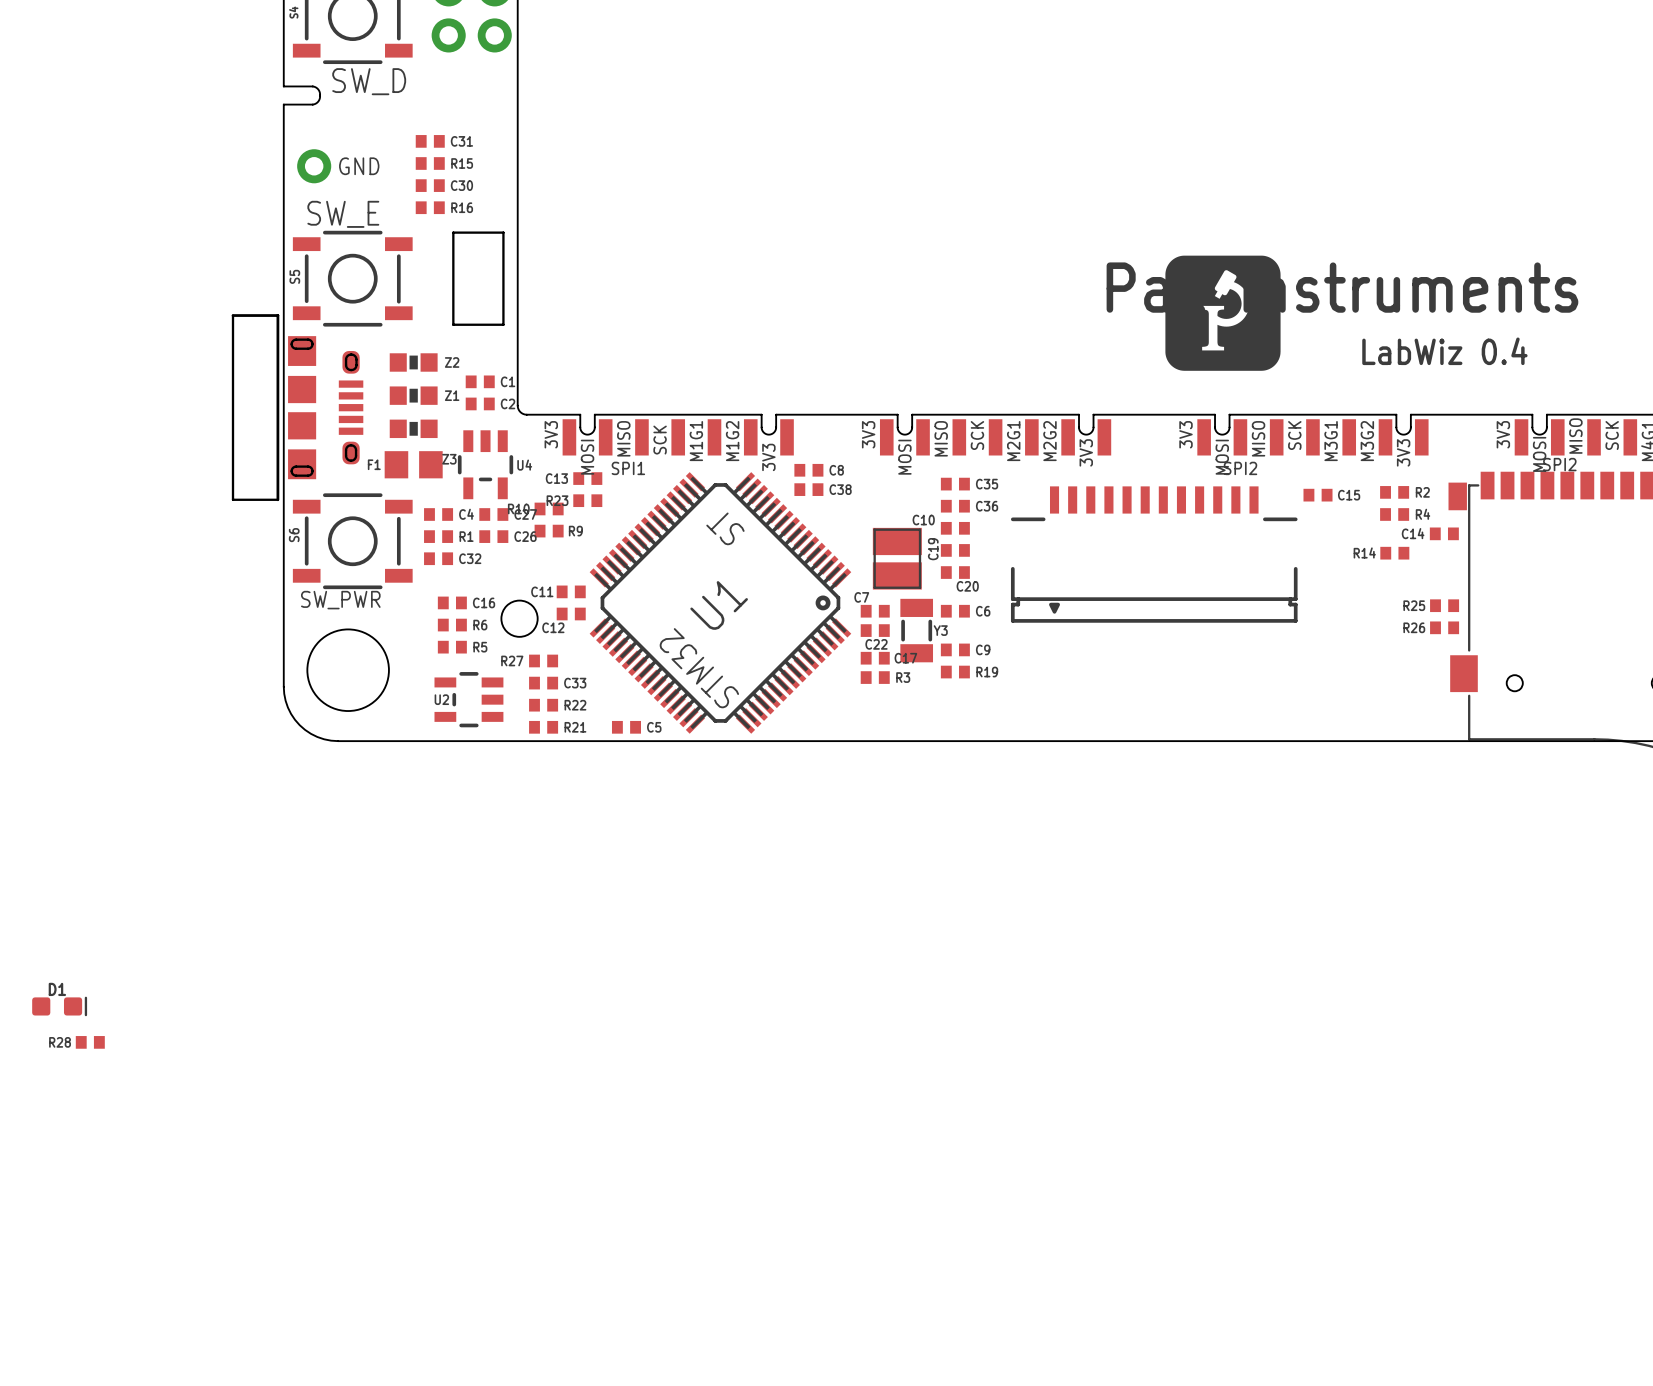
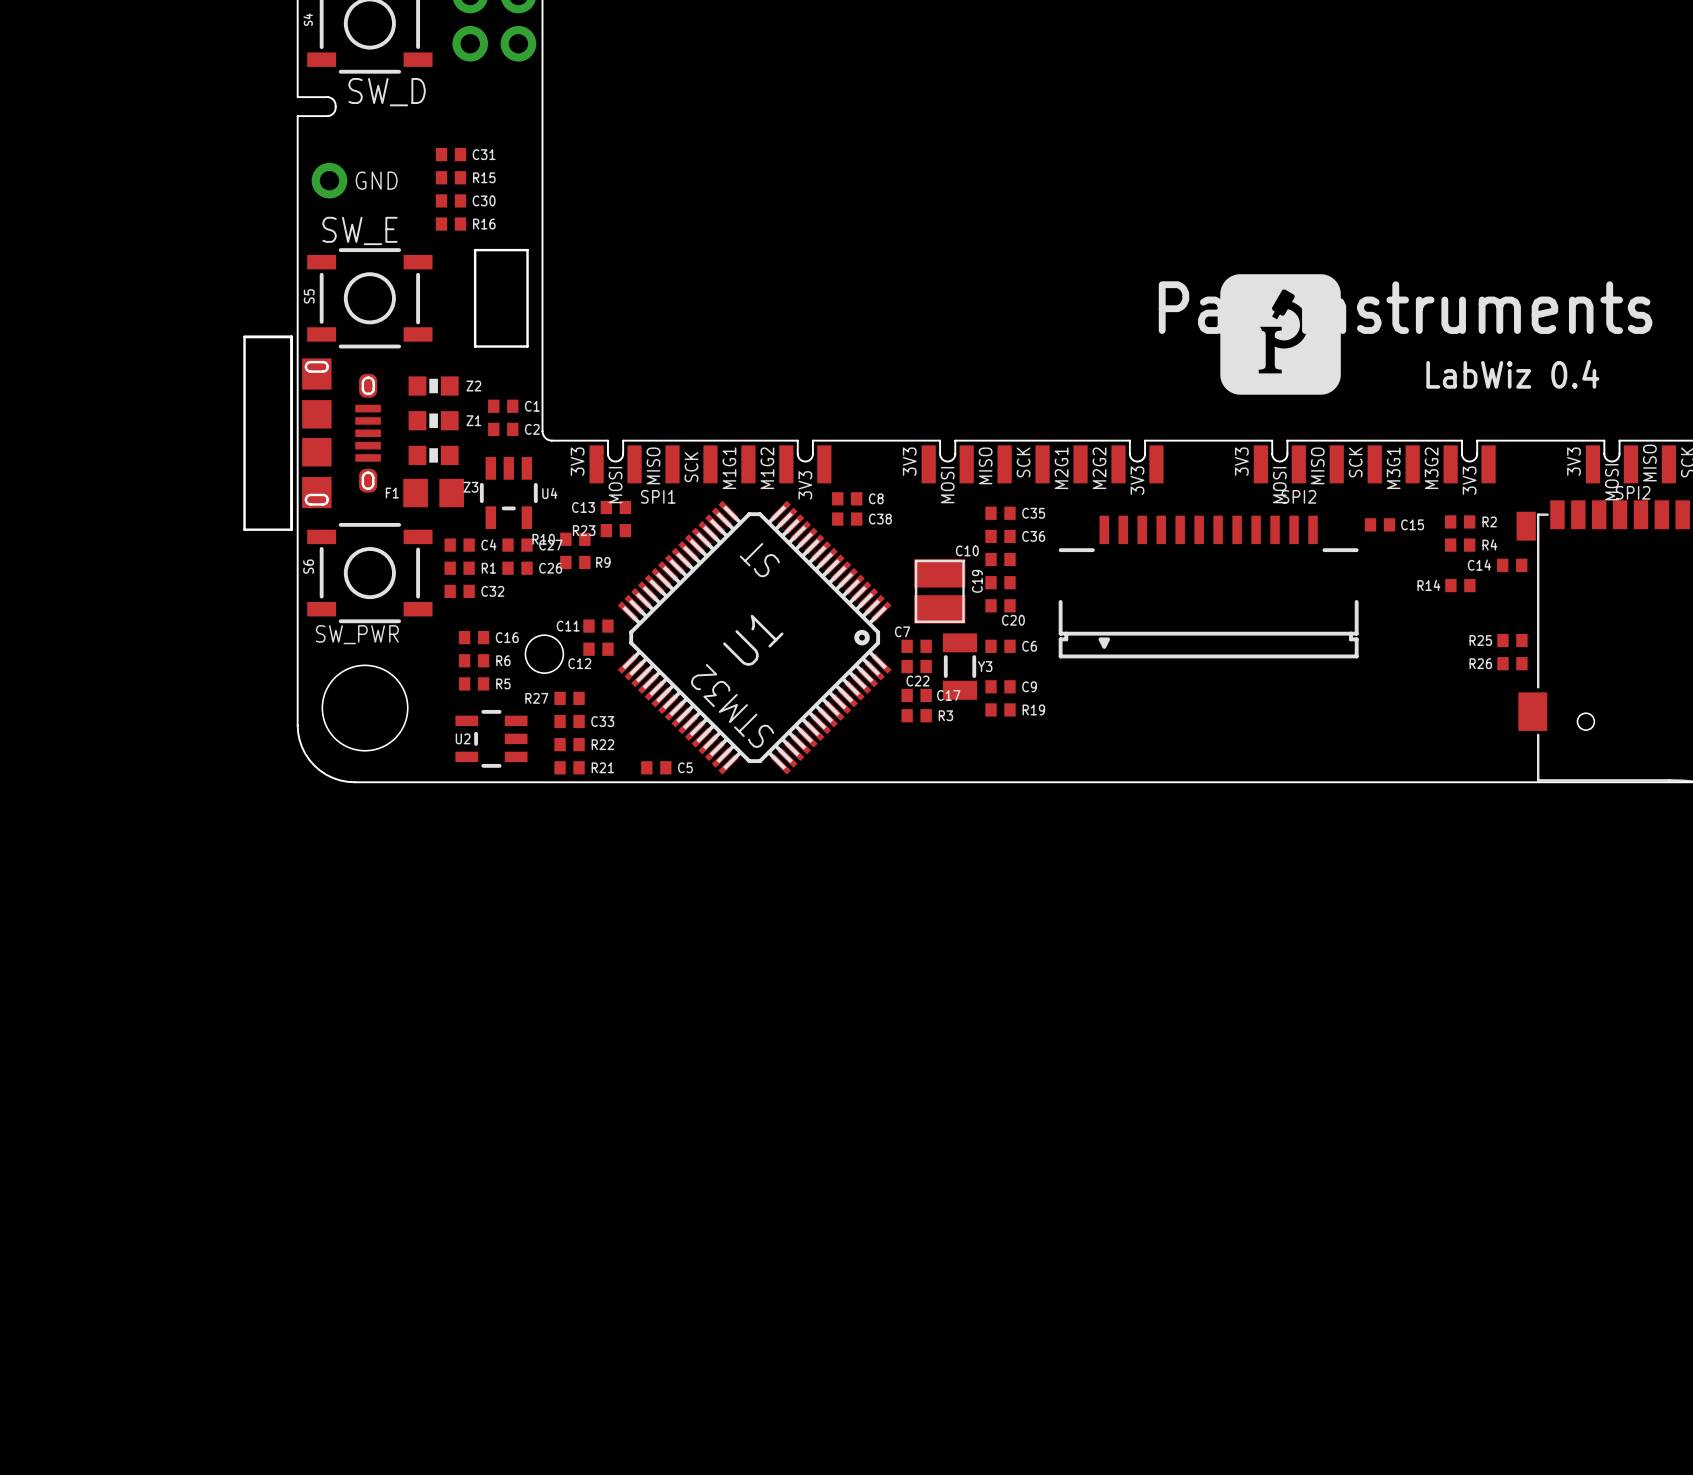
D1: (59, 1006) -> none
R28: (90, 1042) -> none

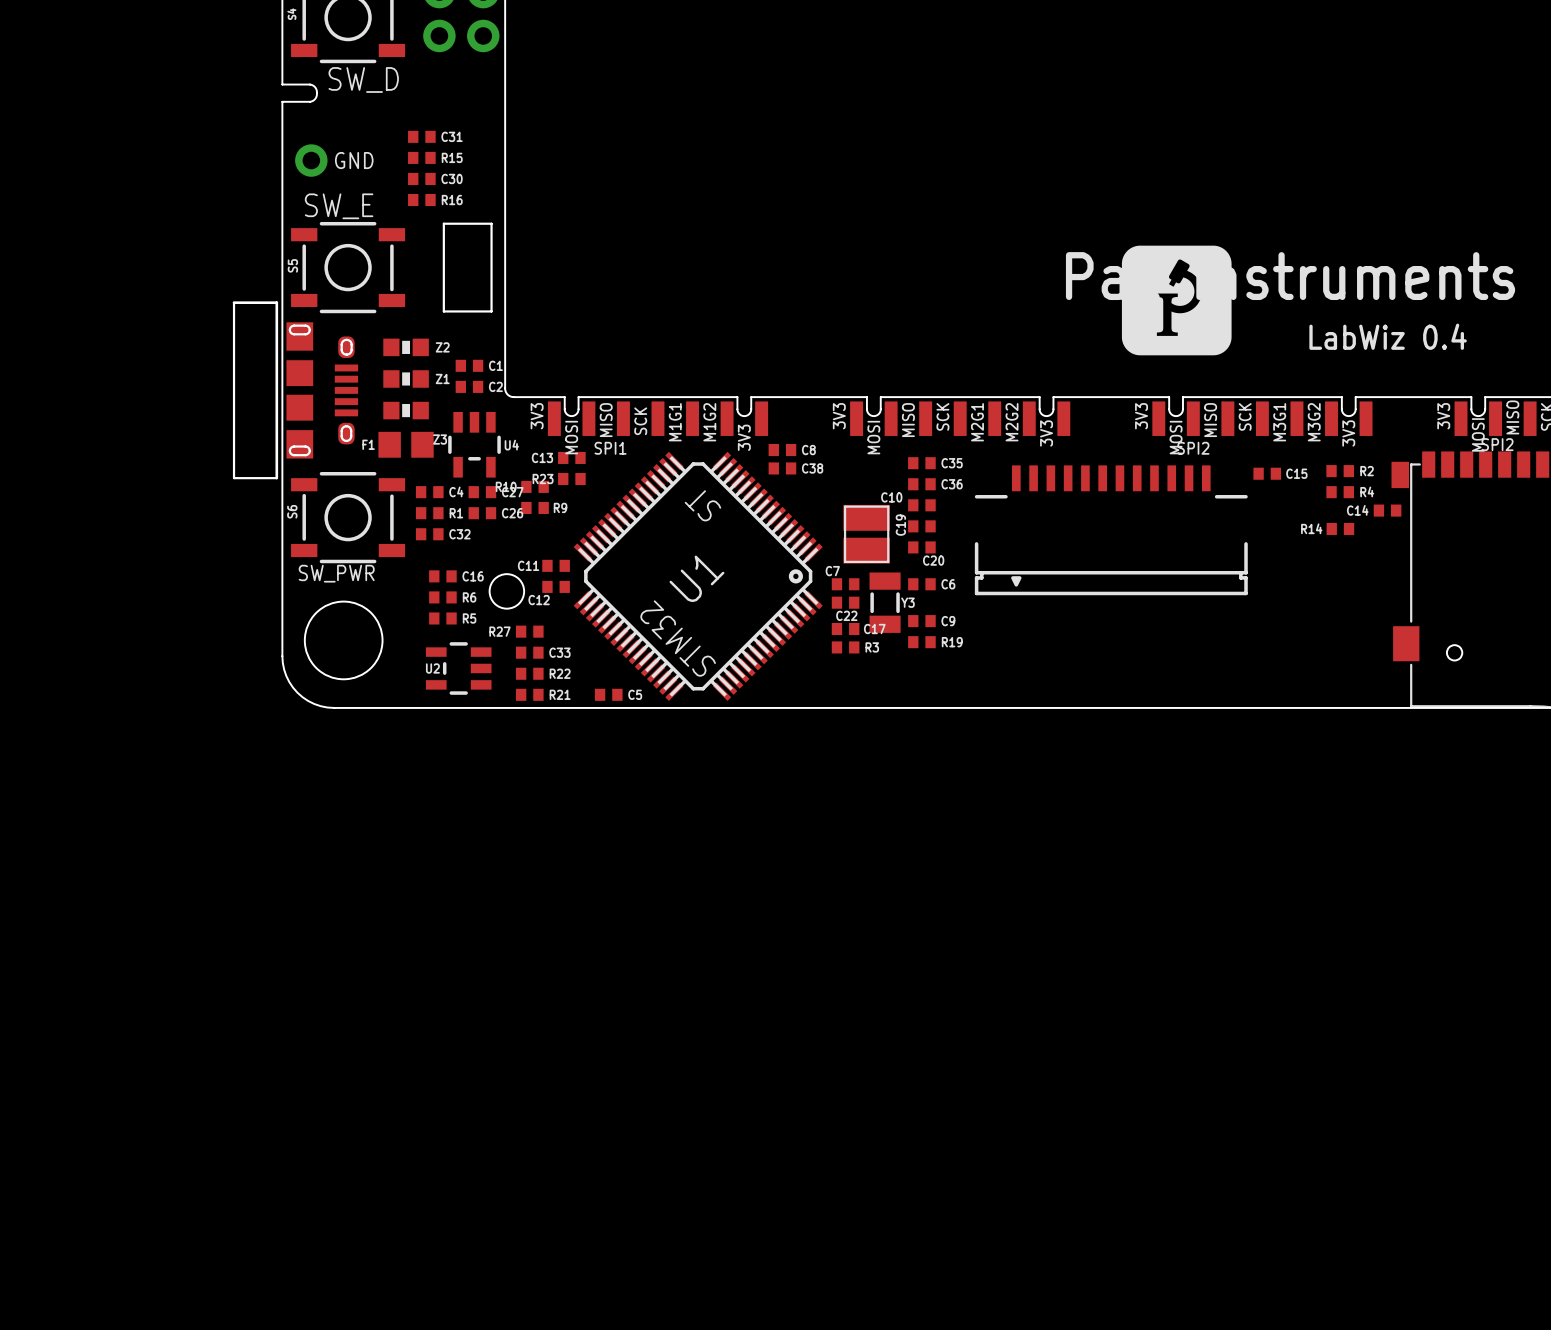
R25: (1512, 640) -> none
R26: (1512, 663) -> none

